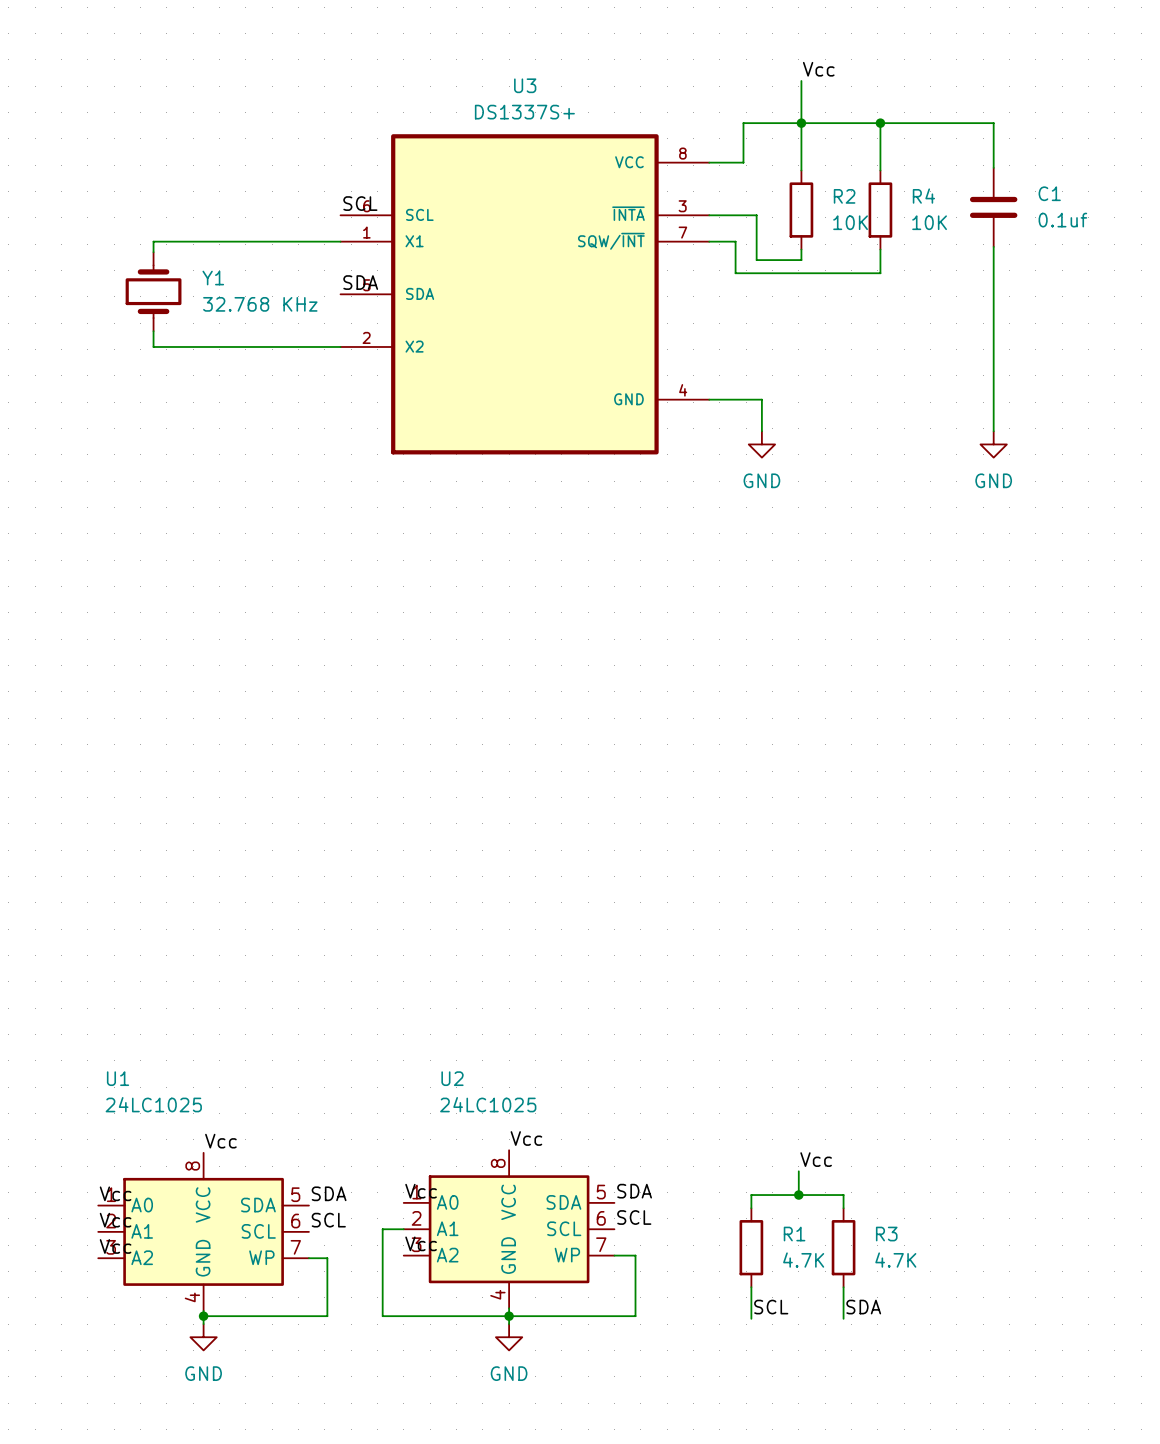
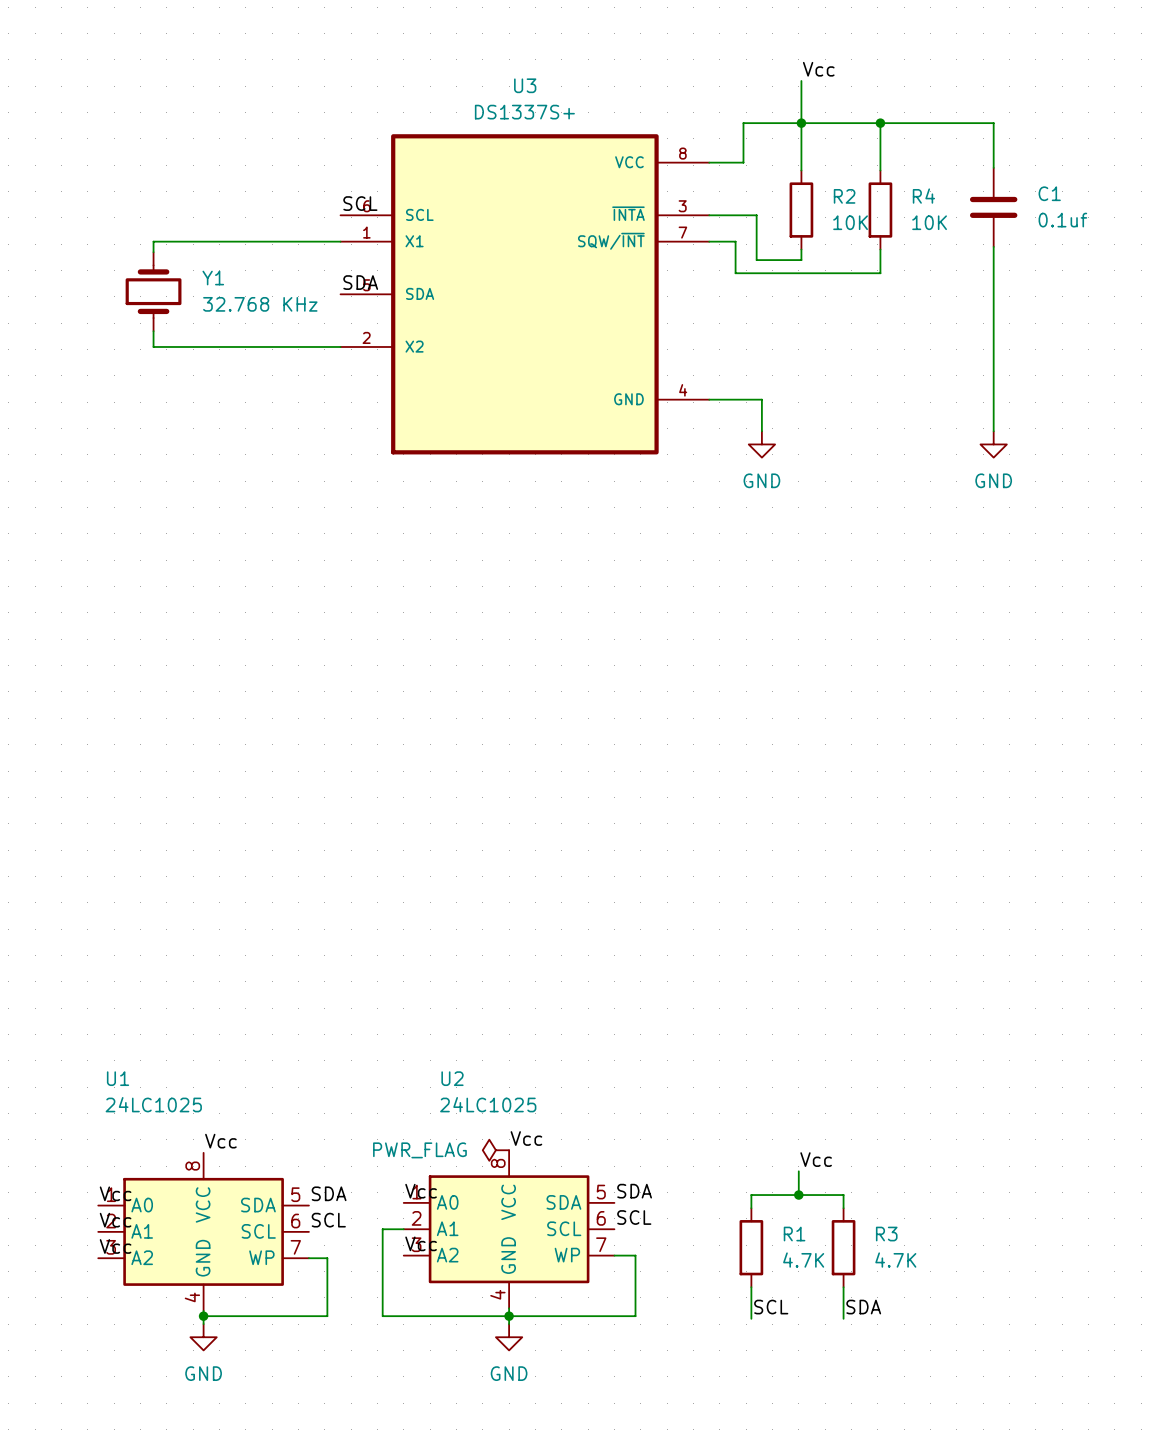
power symbol: none -> PWR_FLAG (495, 1150)

